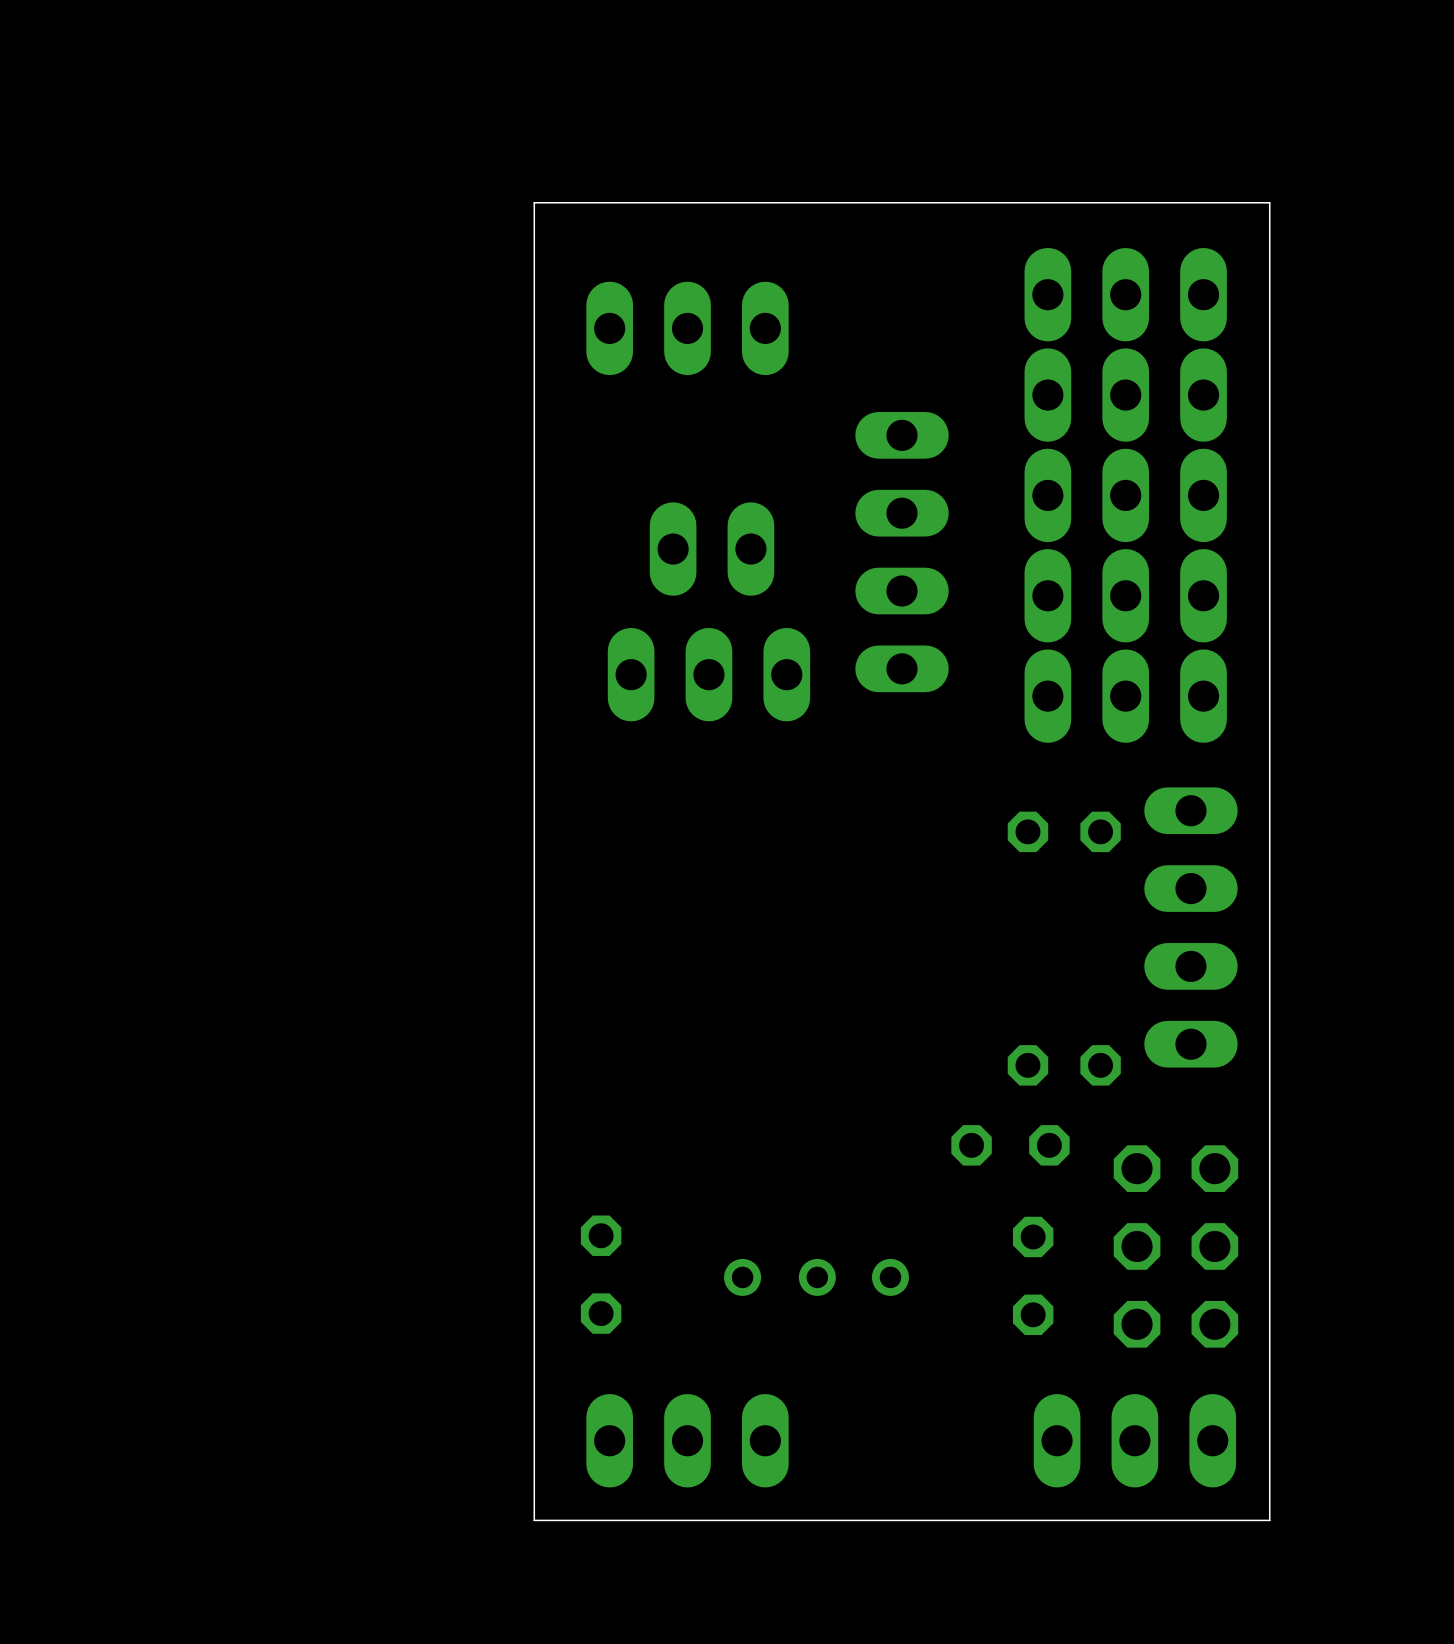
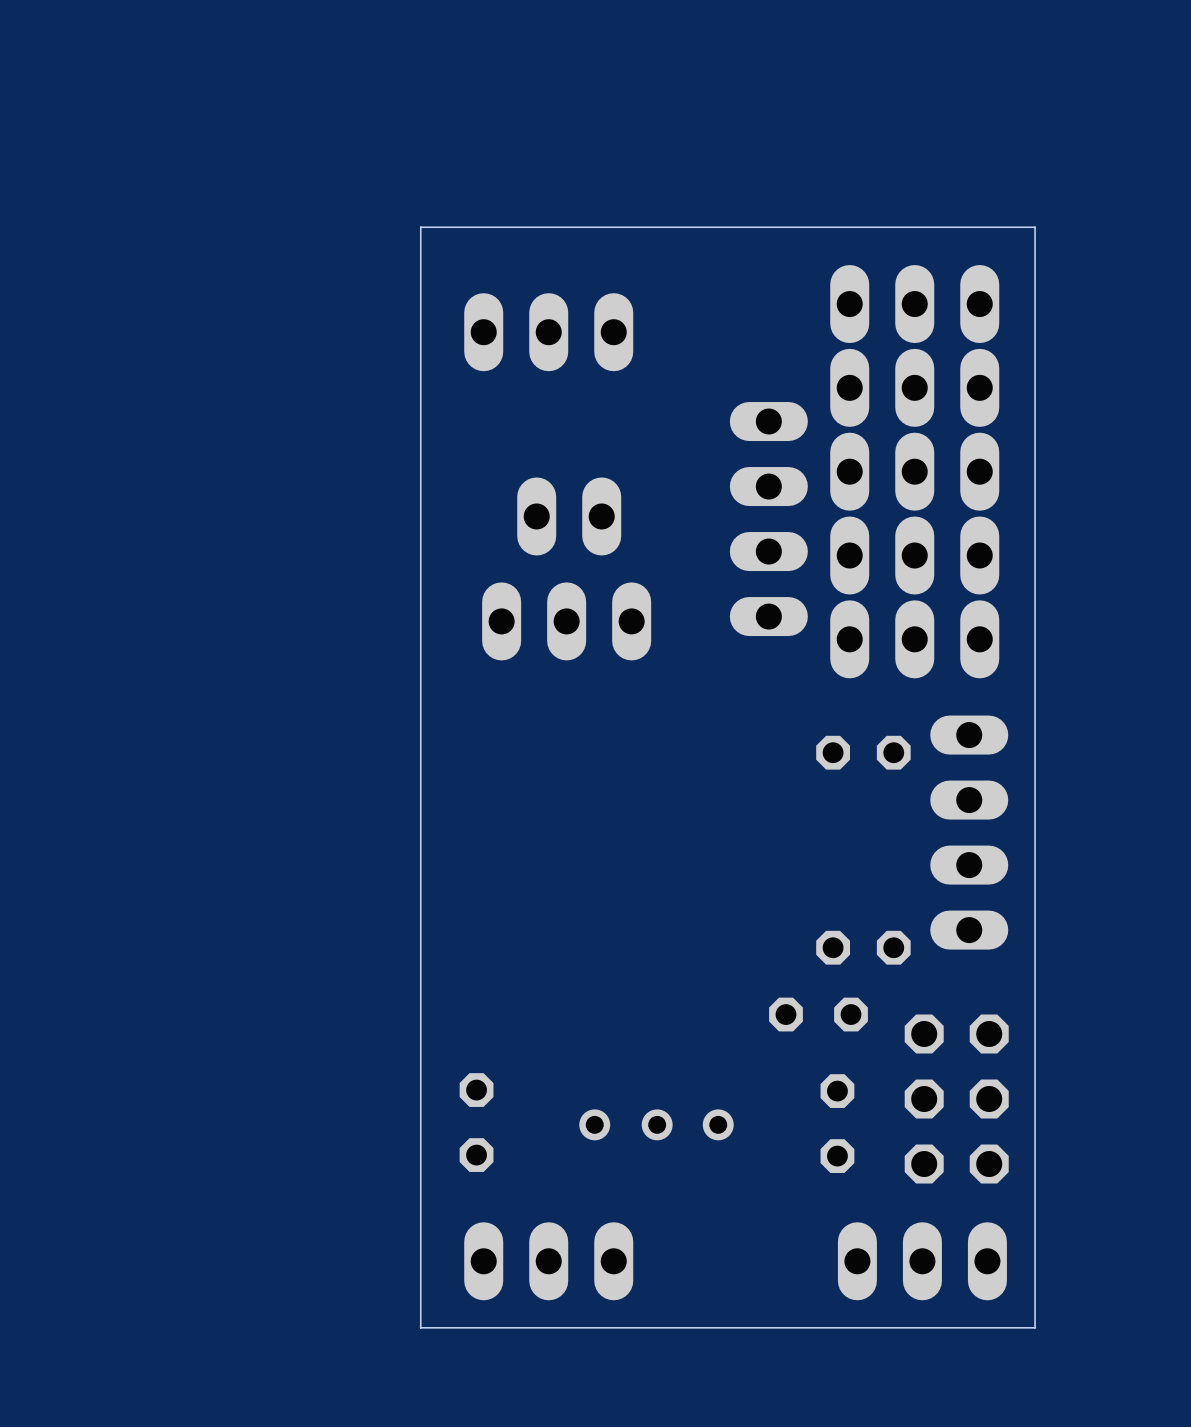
part position: (902, 552) -> (768, 519)

